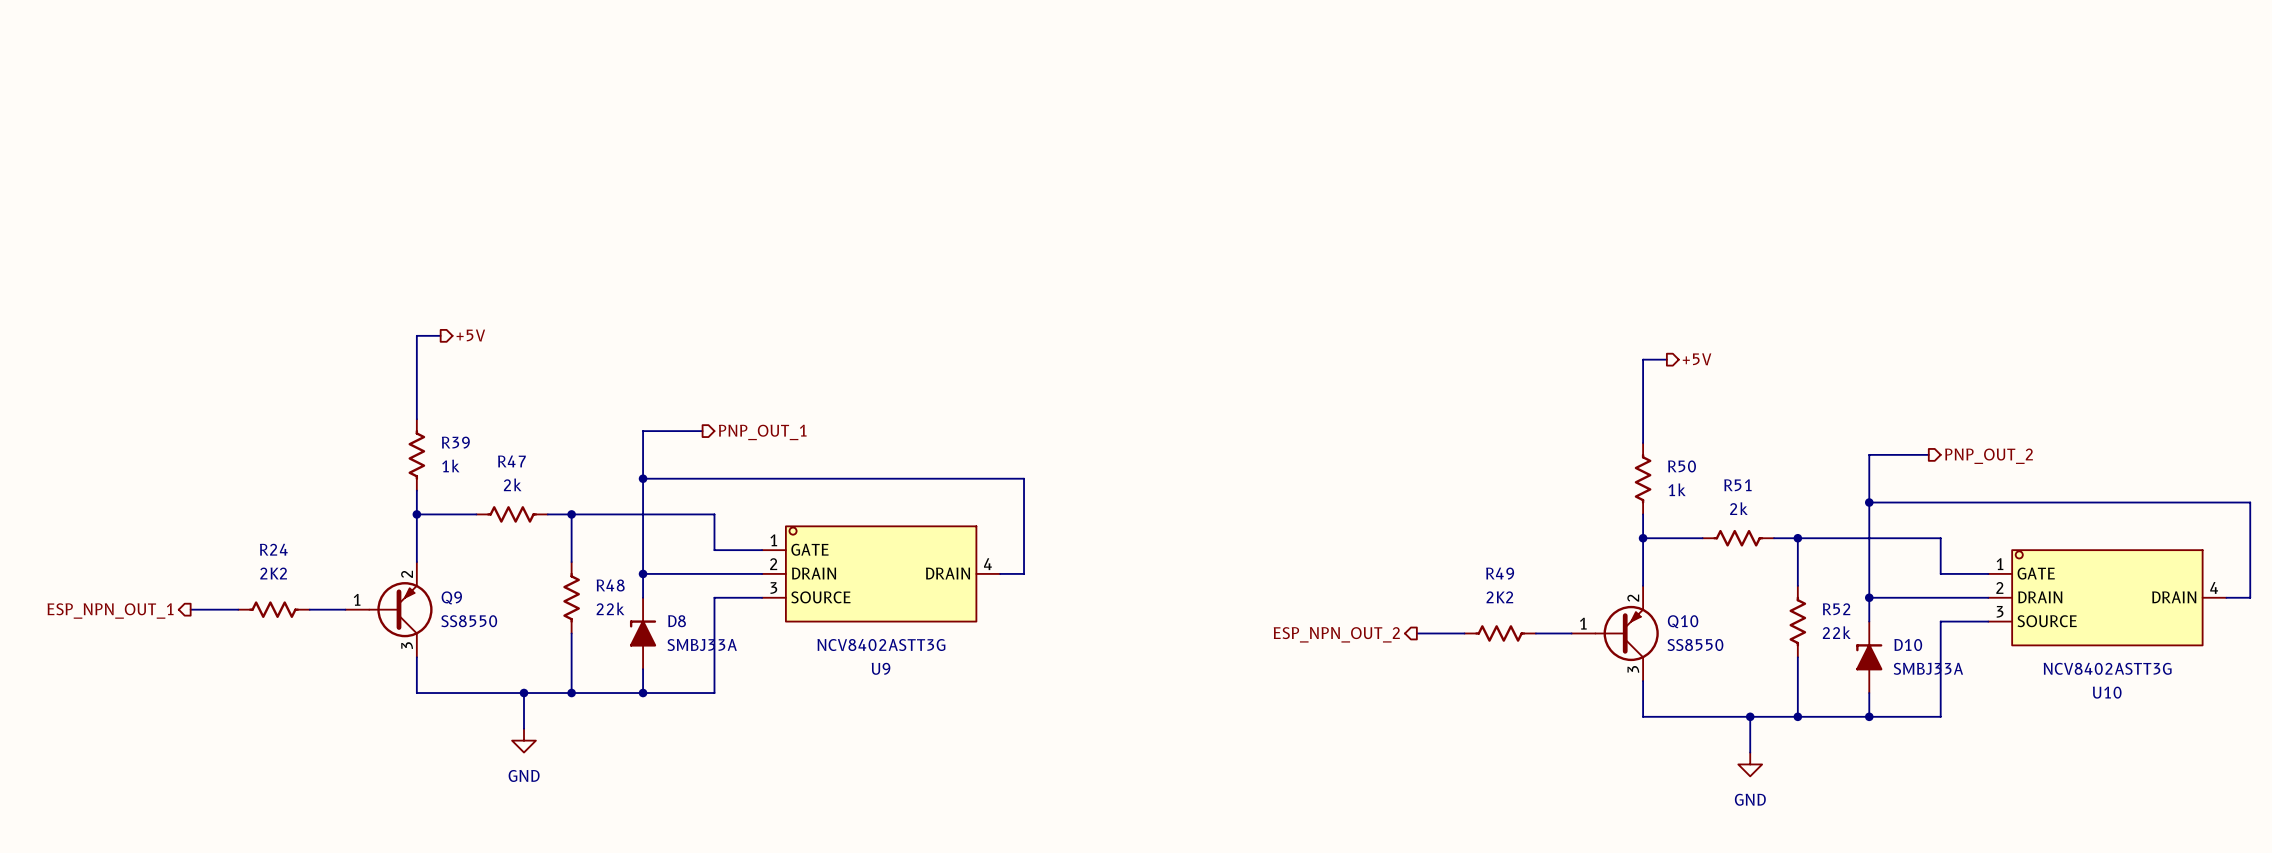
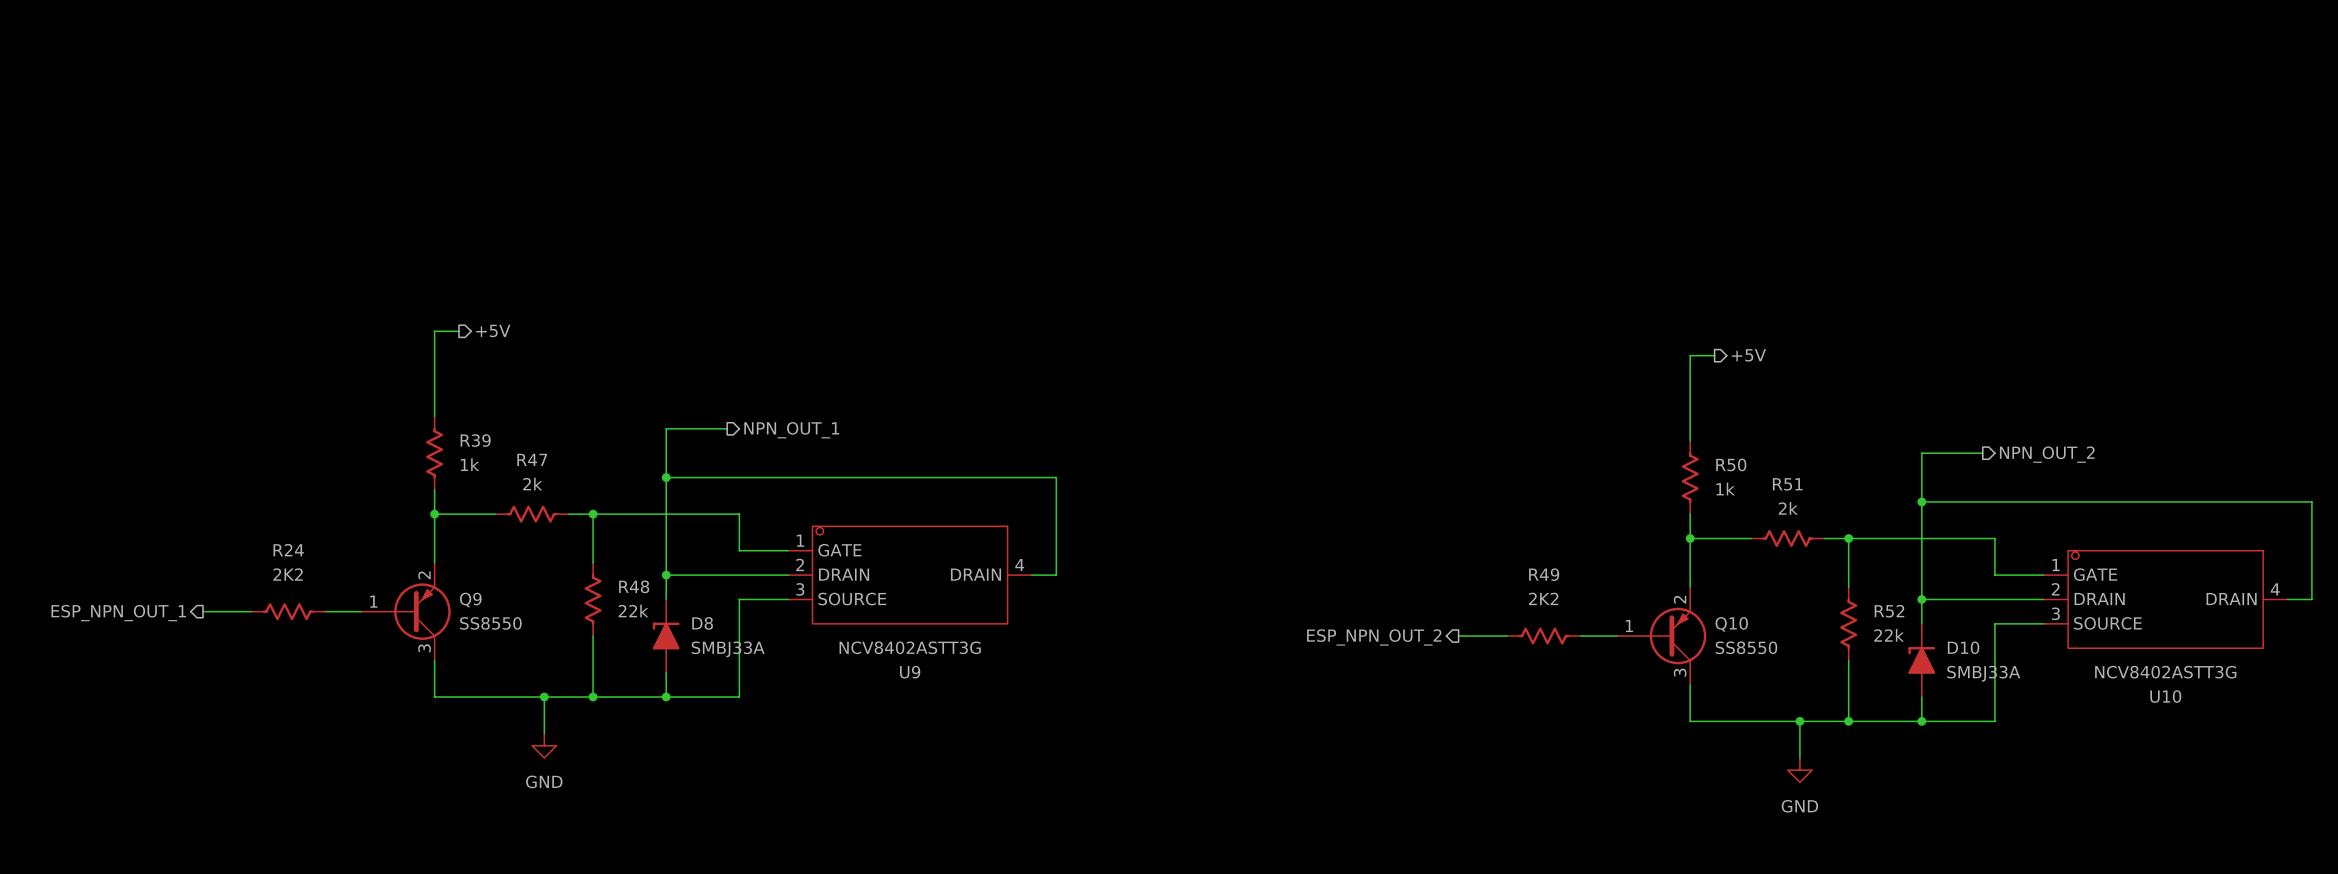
hierarchical label: PNP_OUT_1 (762, 432) -> NPN_OUT_1 (791, 430)
hierarchical label: PNP_OUT_2 (1989, 456) -> NPN_OUT_2 (2047, 454)

